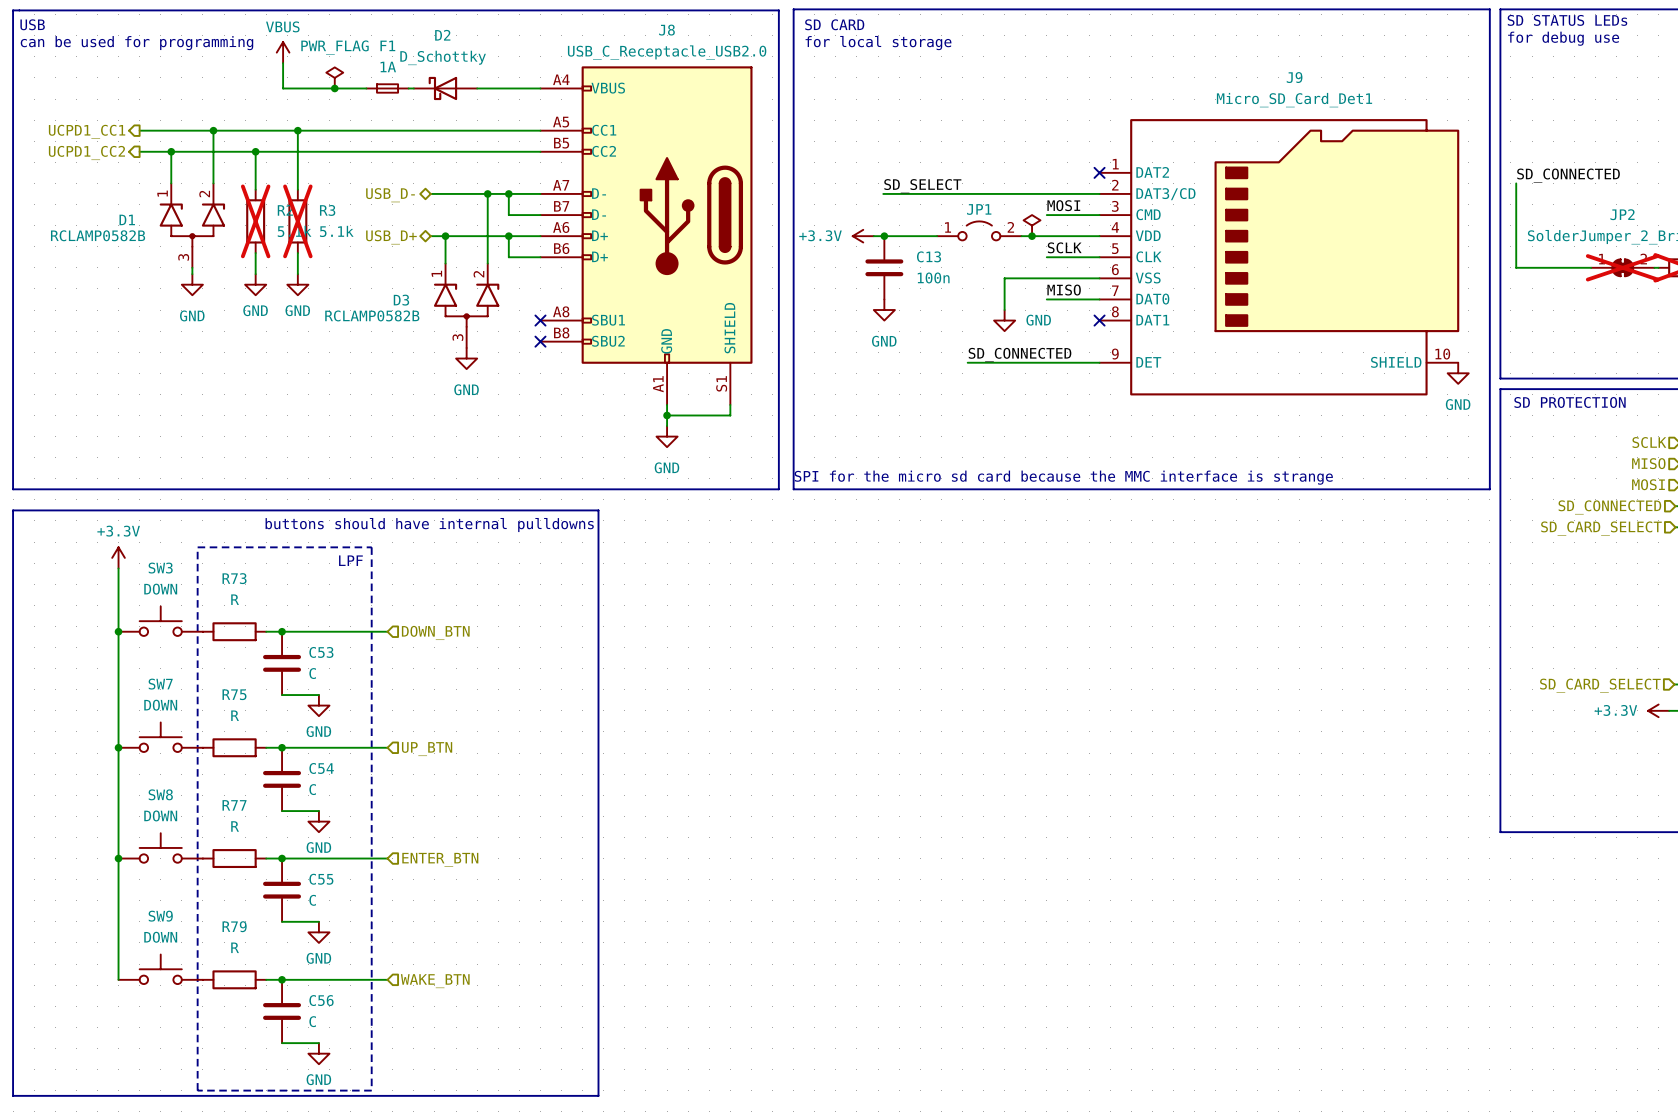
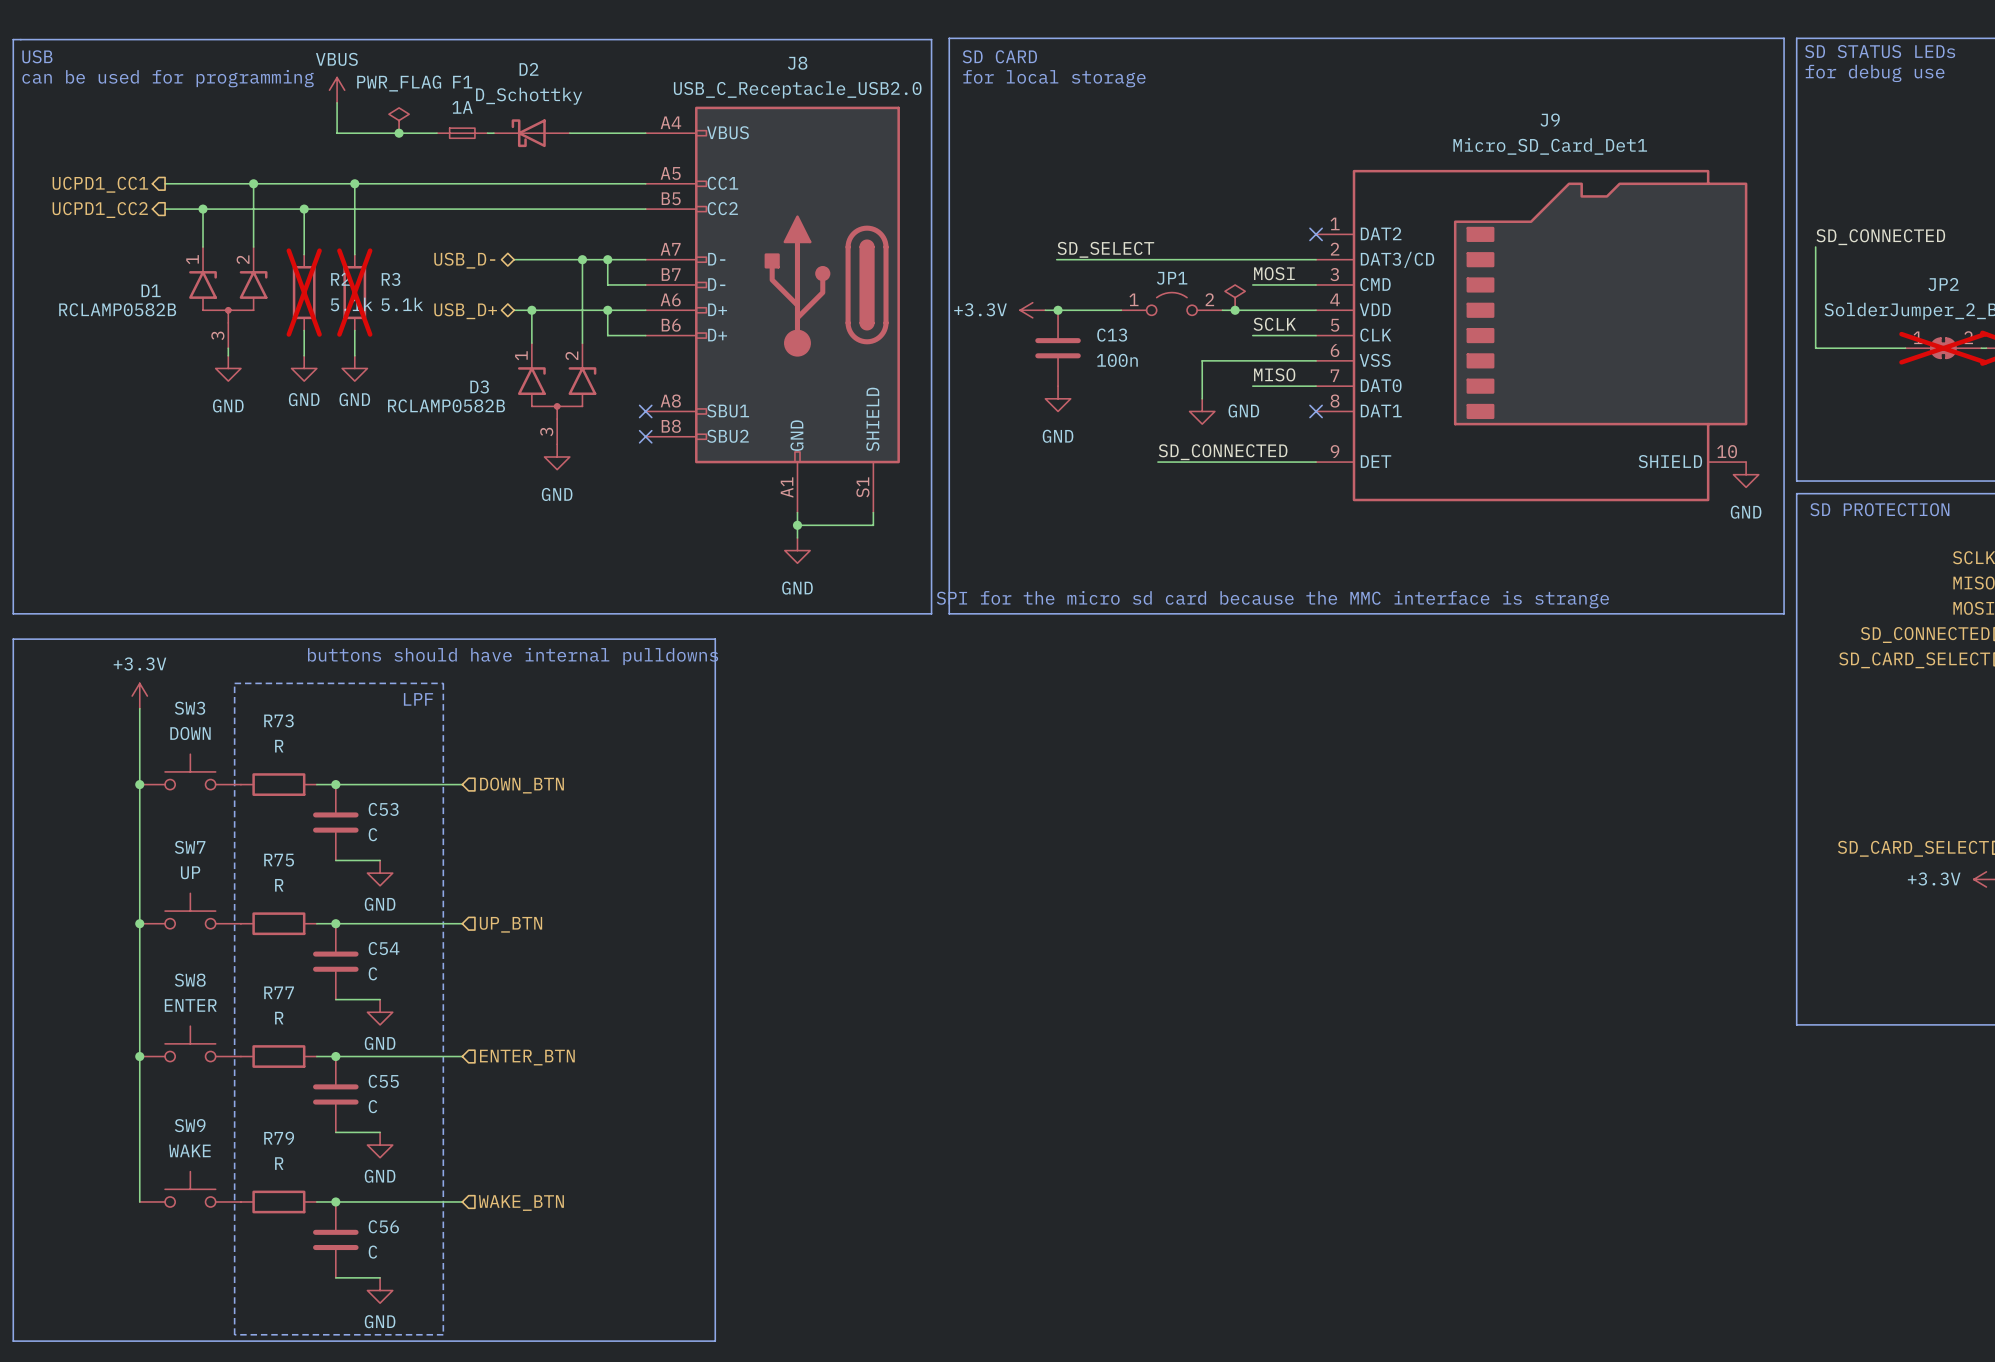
SW7 value: DOWN (160, 705) -> UP (190, 872)
SW8 value: DOWN (160, 815) -> ENTER (190, 1005)
SW9 value: DOWN (160, 937) -> WAKE (189, 1150)

